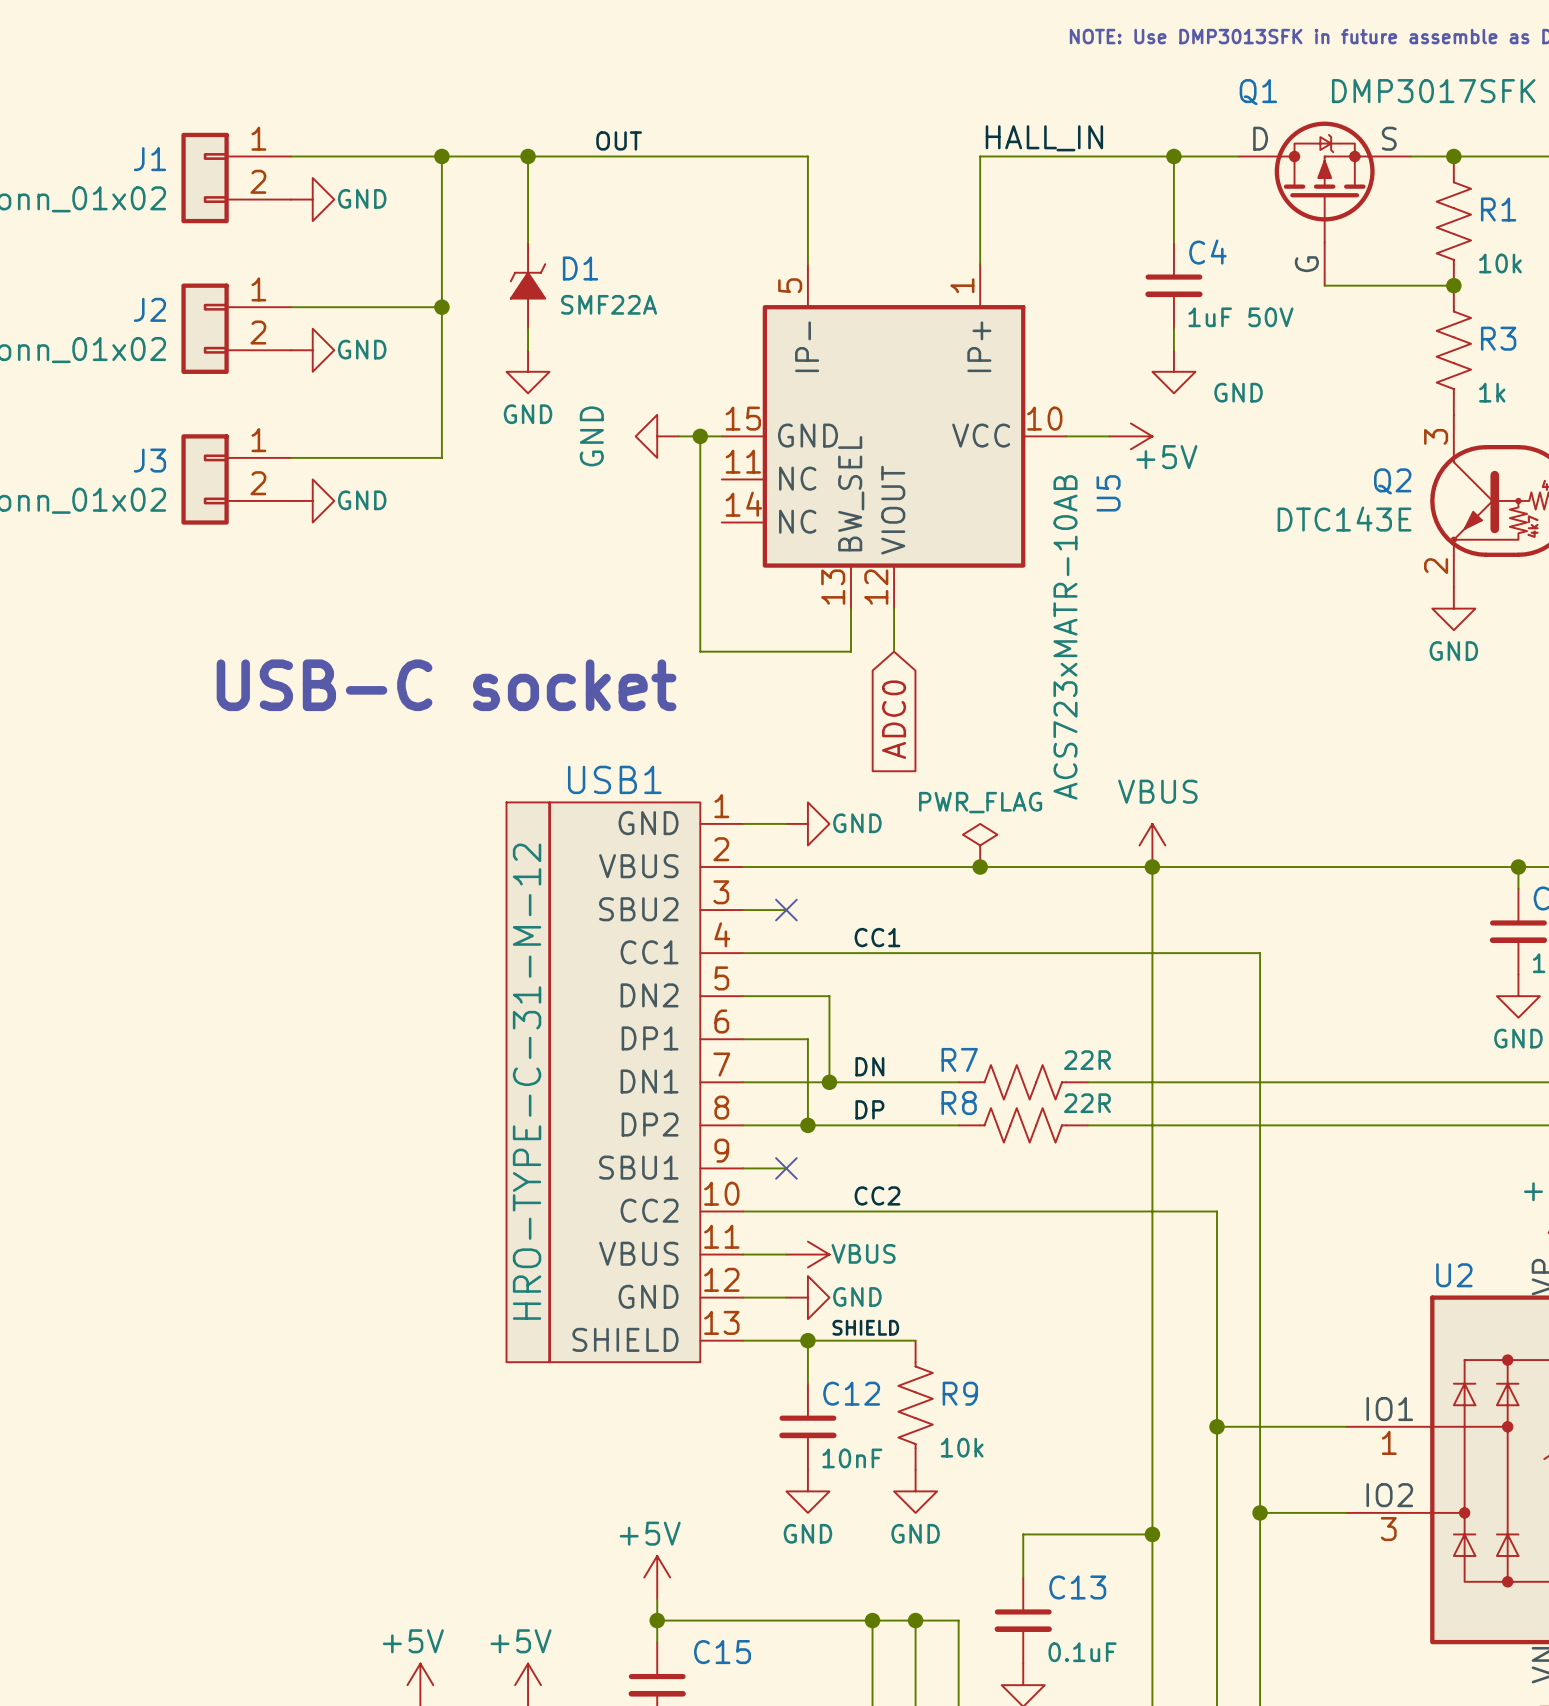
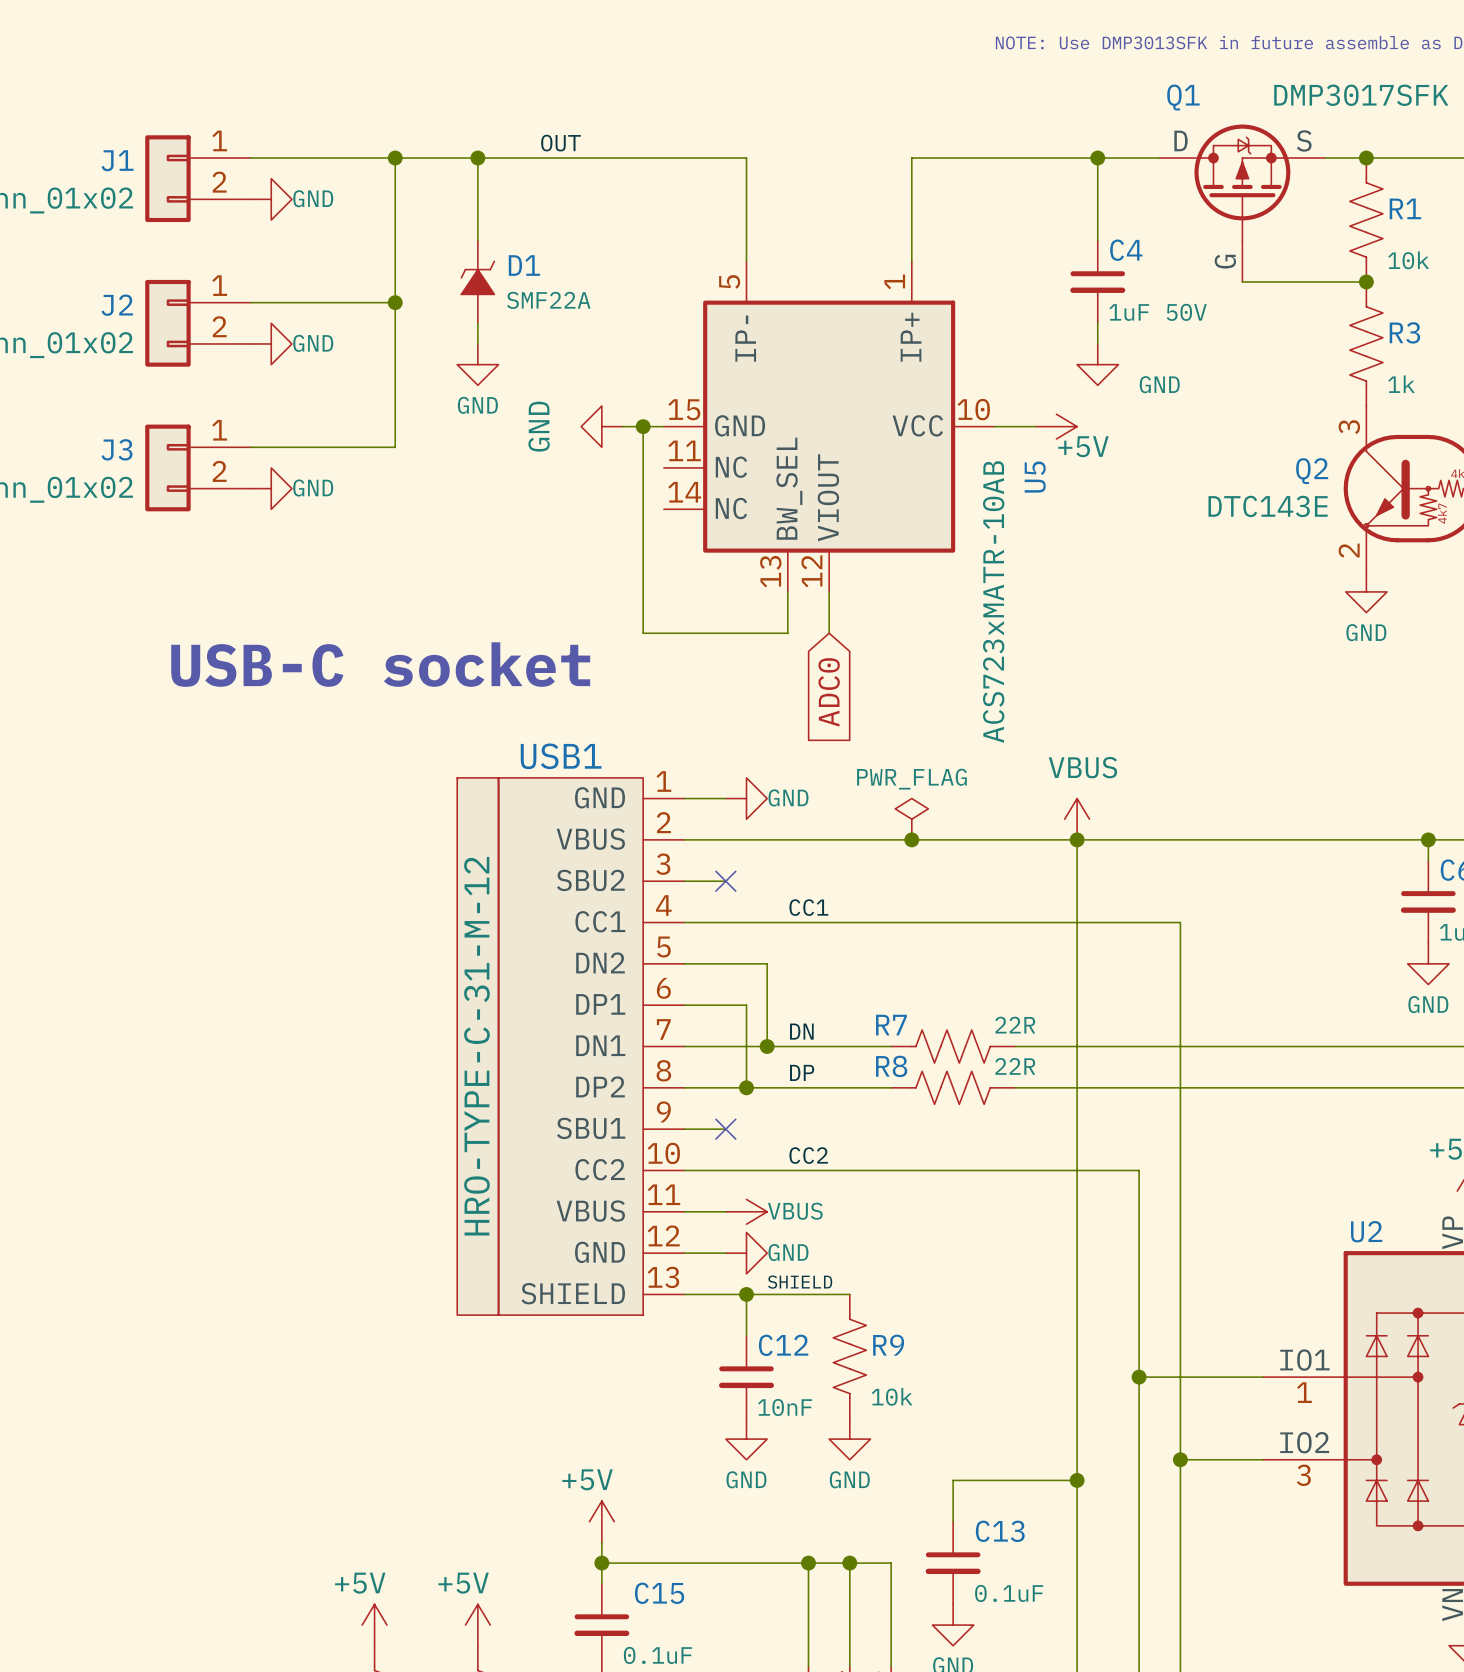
label: HALL_IN (1044, 138) -> none

